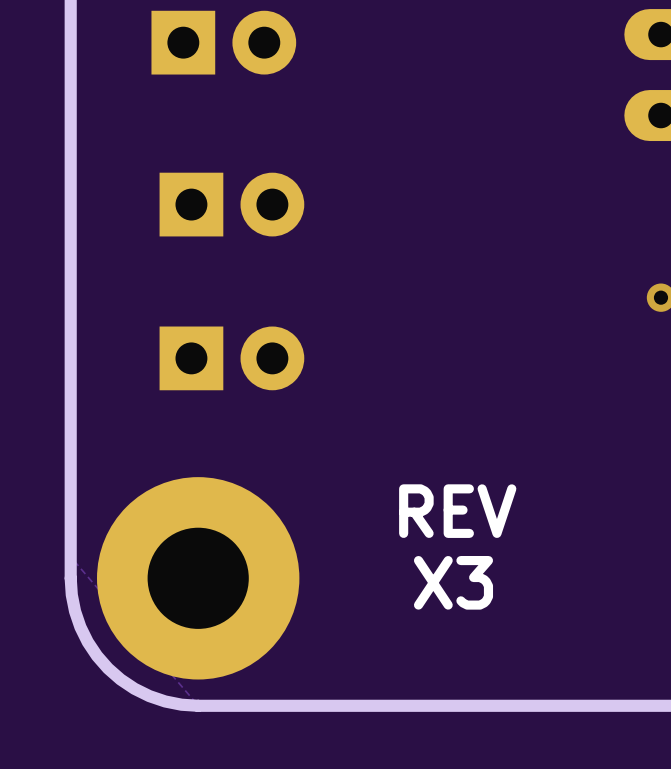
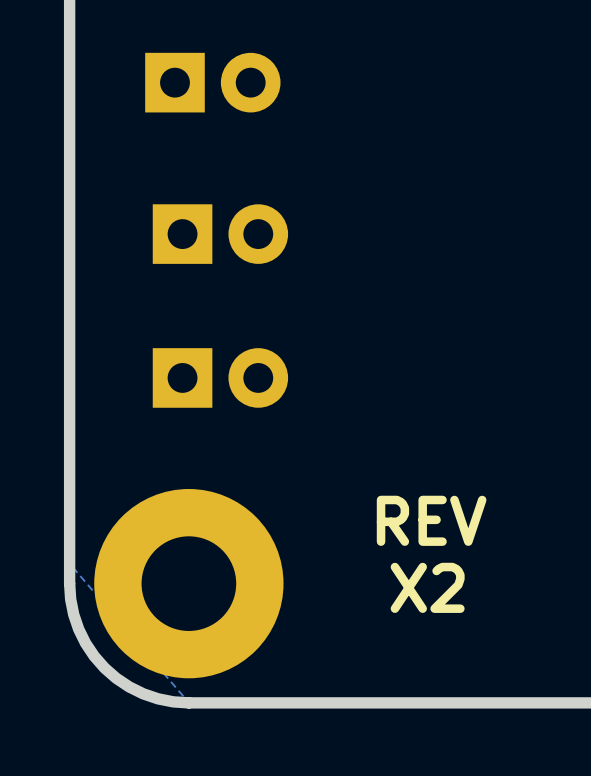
text: X3 (453, 582) -> X2 (427, 587)

